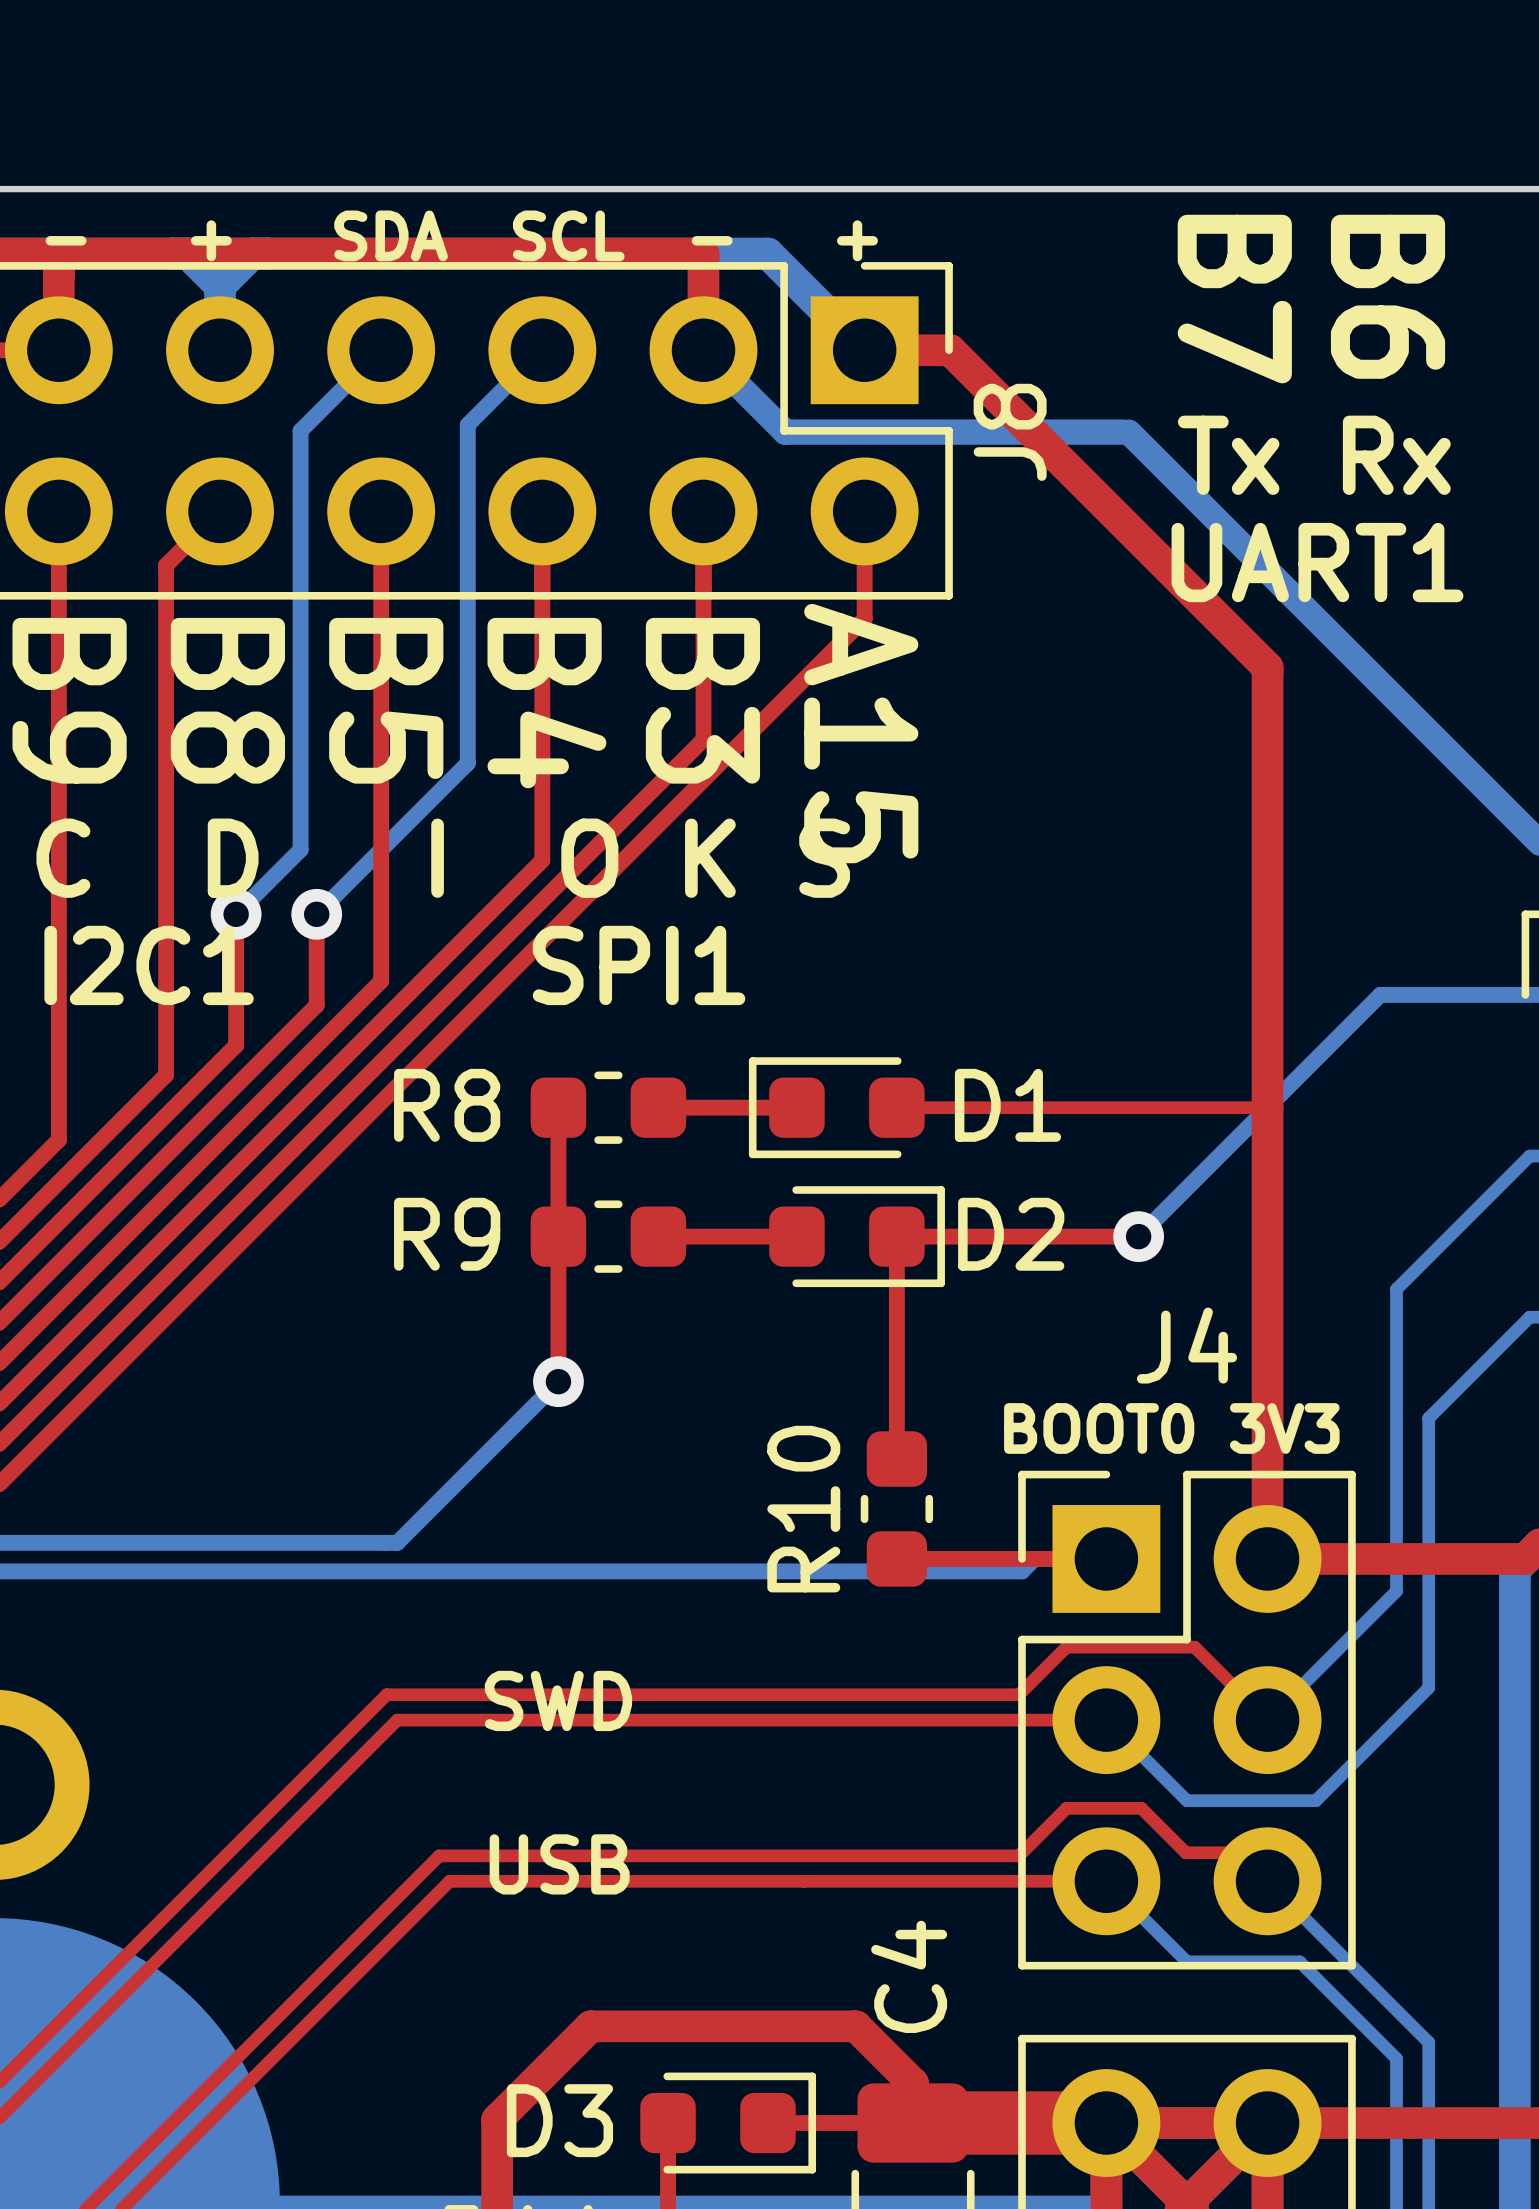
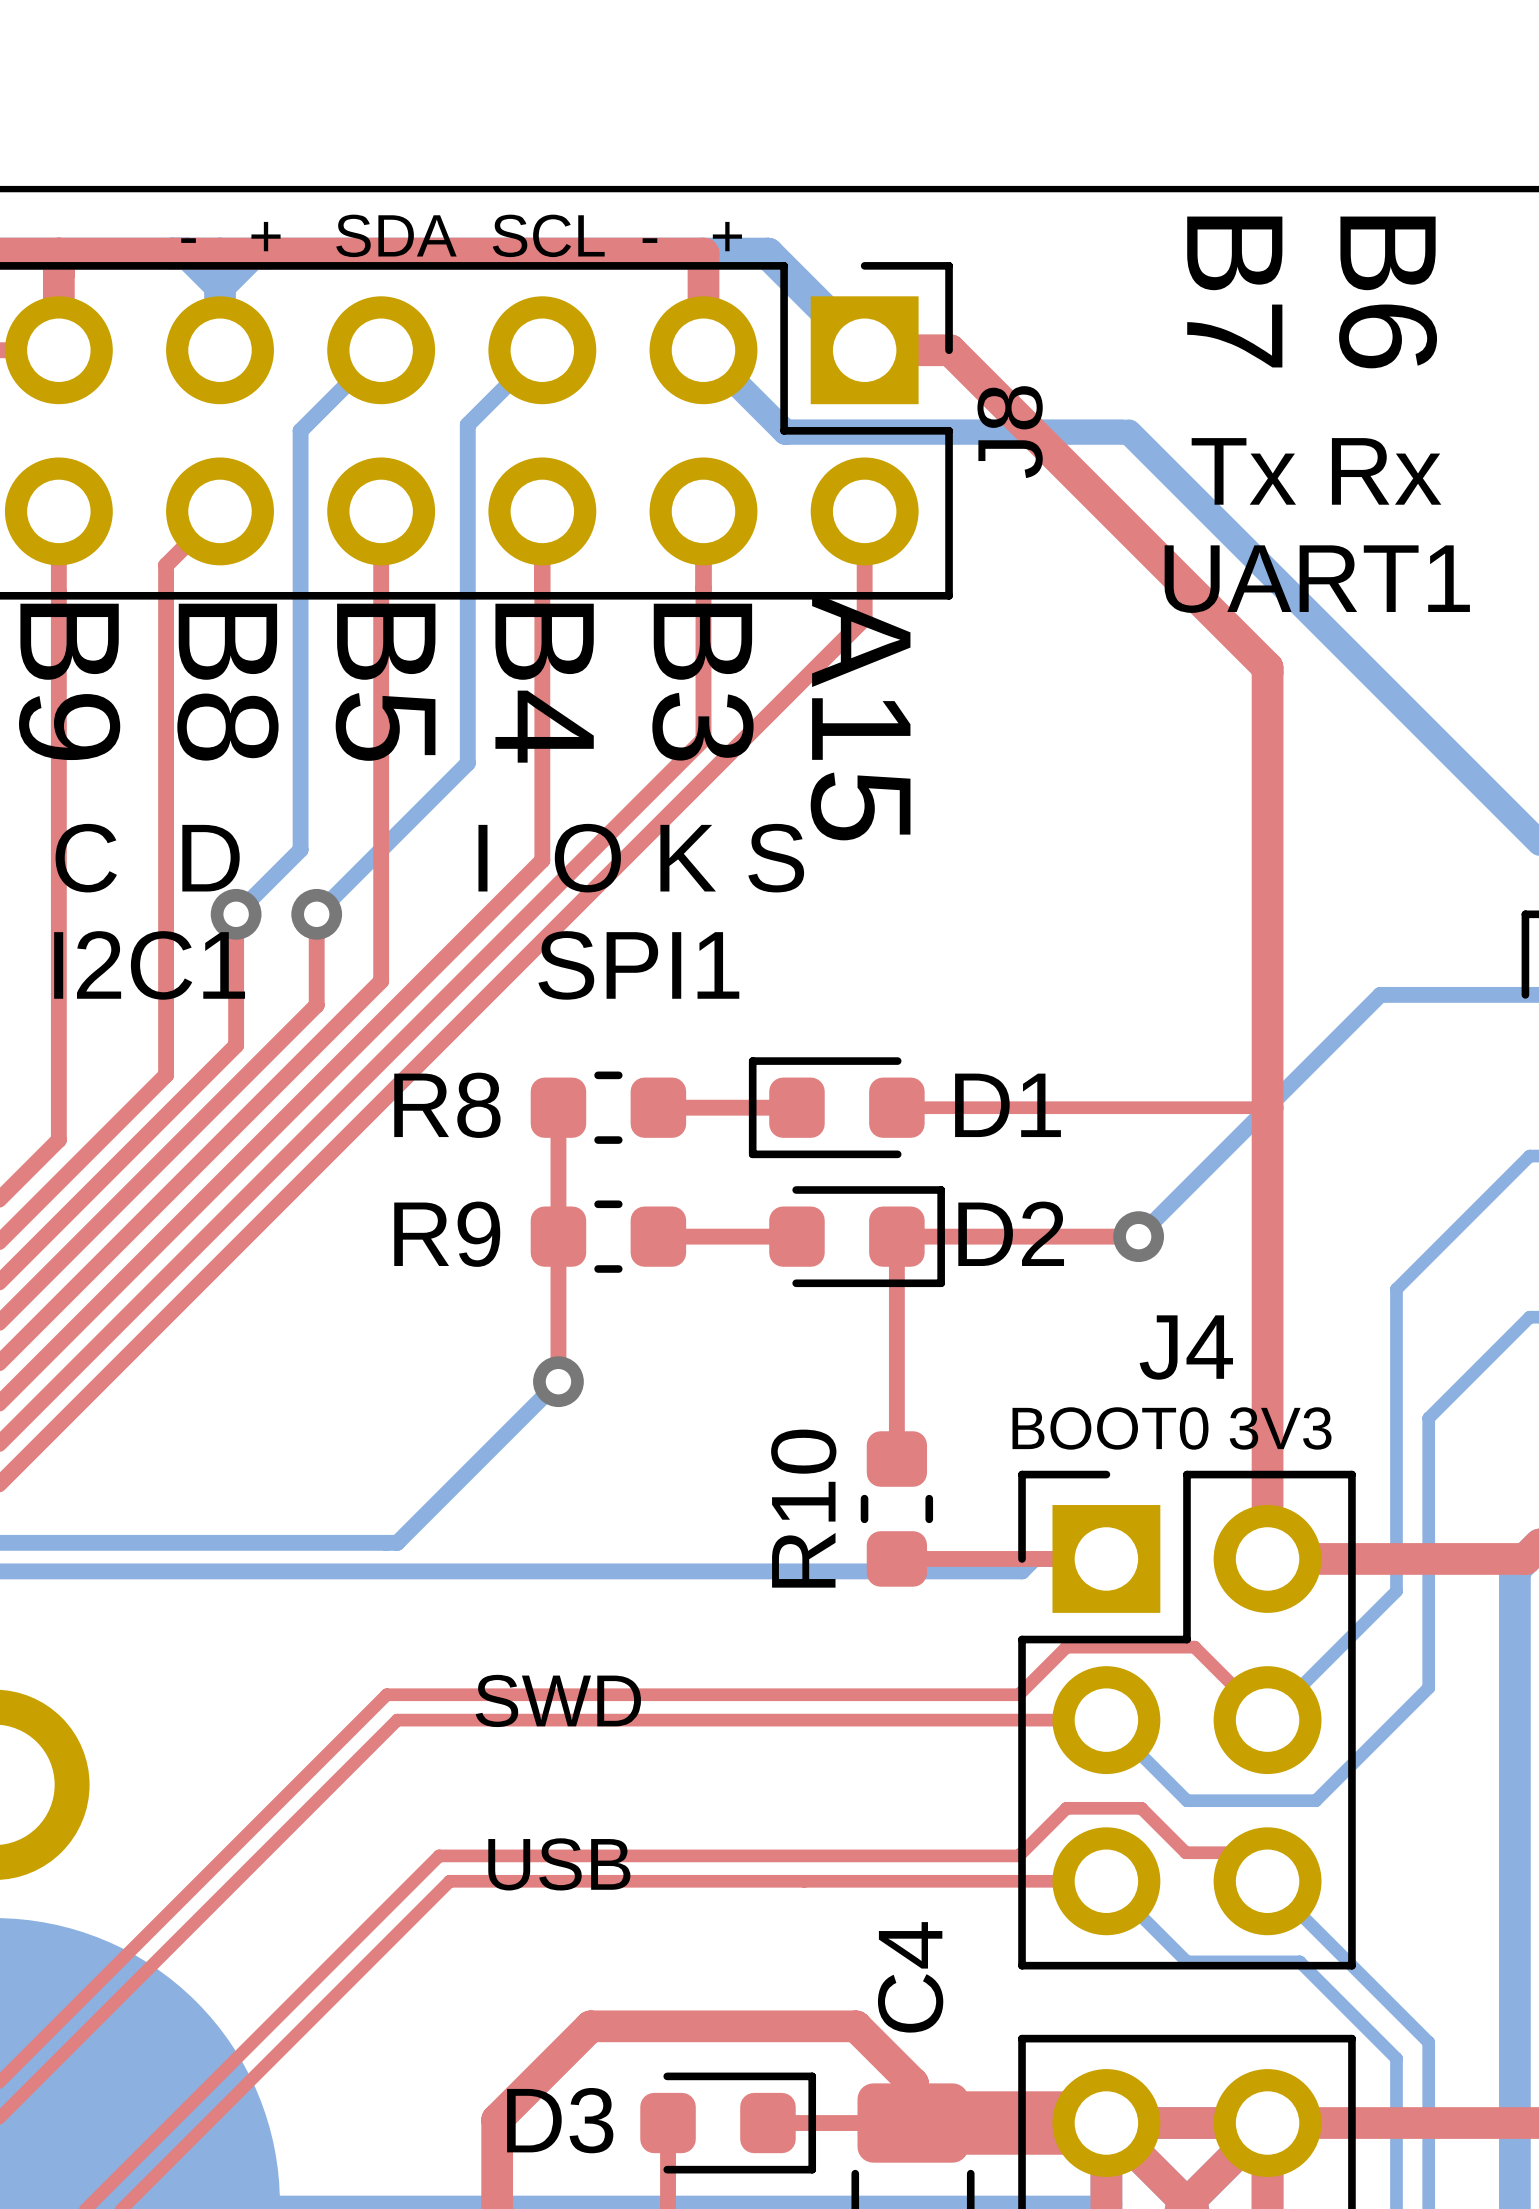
text position: B6 (1388, 296) -> B6 (1388, 292)
text position: B7 (1234, 299) -> B7 (1234, 292)
text position: Tx Rx (1314, 455) -> Tx Rx (1316, 471)
text position: UART1 (1317, 562) -> UART1 (1317, 579)

